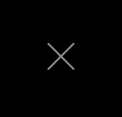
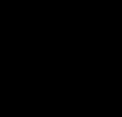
no-connect mark: (60, 56) -> none

